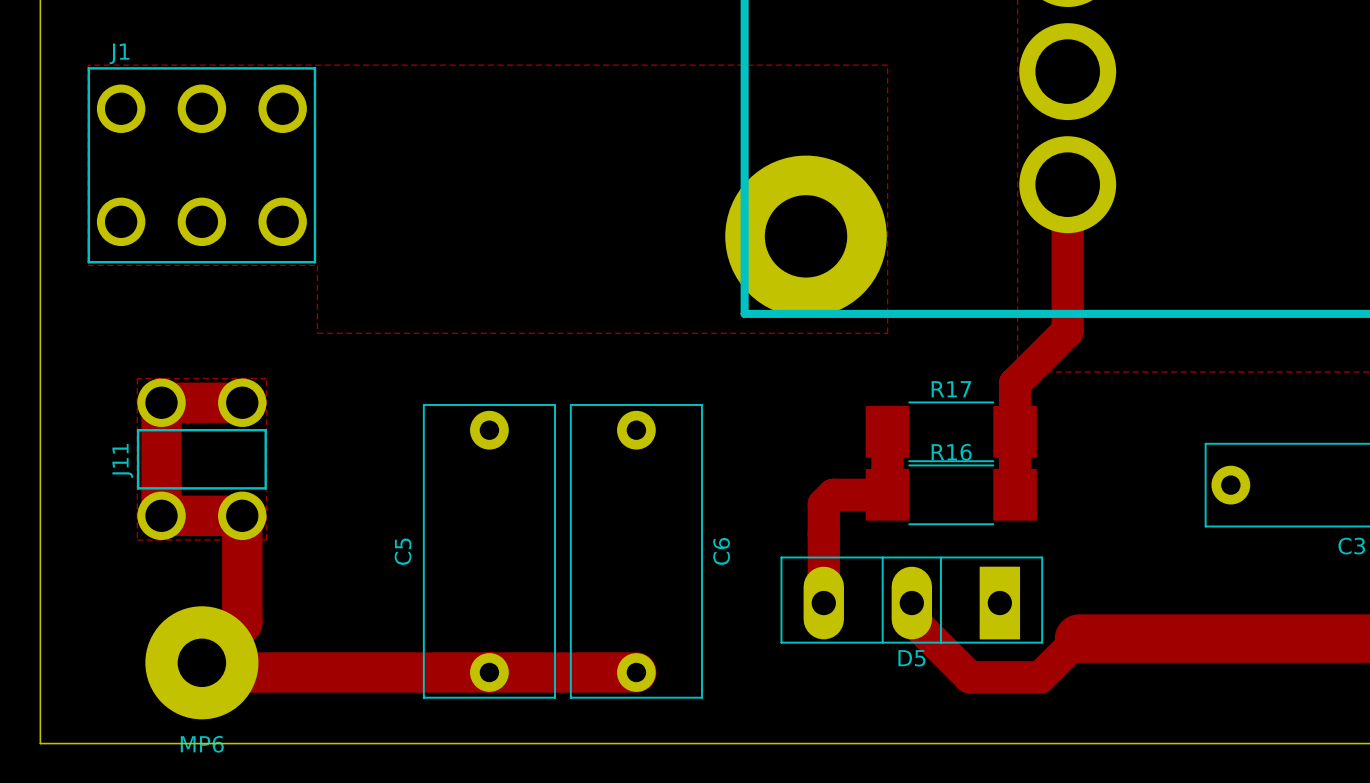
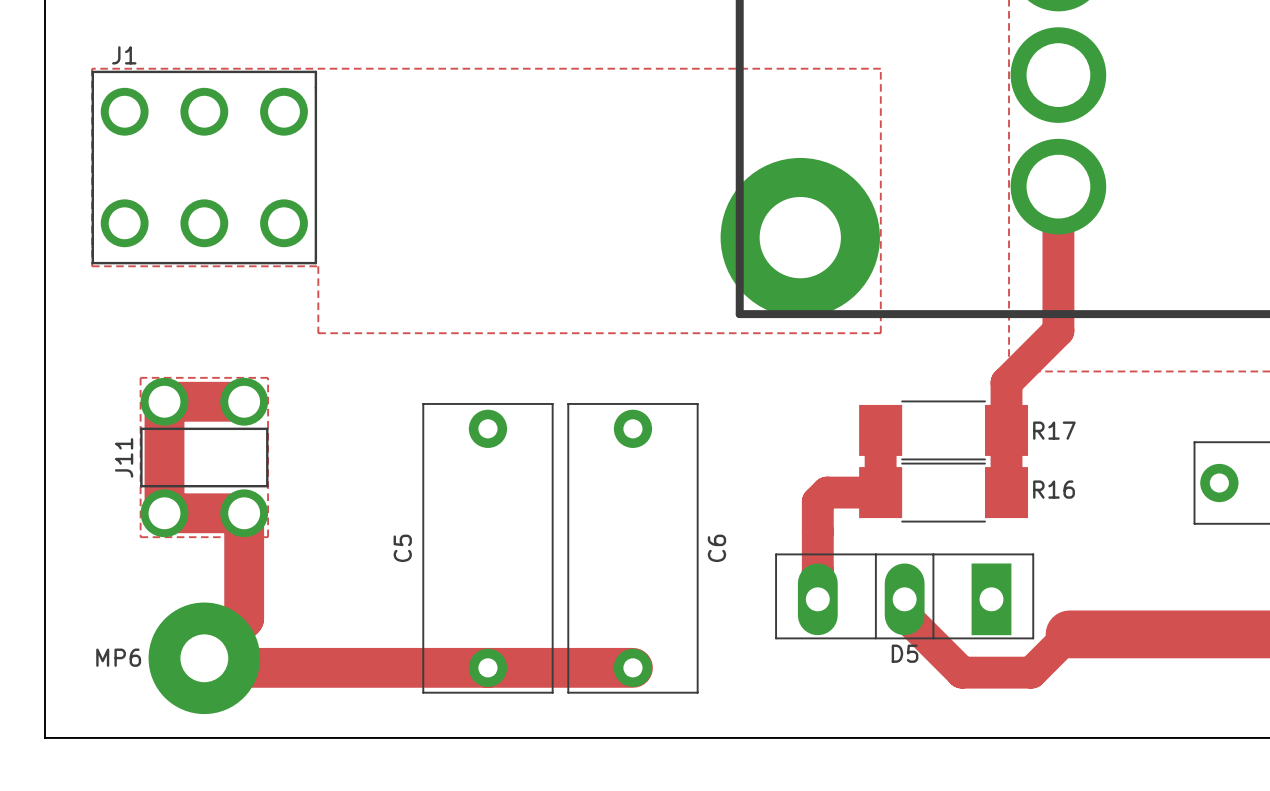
R17 name position: R17 (951, 389) -> R17 (1054, 430)
R16 name position: R16 (951, 452) -> R16 (1054, 489)
MP6 name position: MP6 (202, 744) -> MP6 (118, 657)

